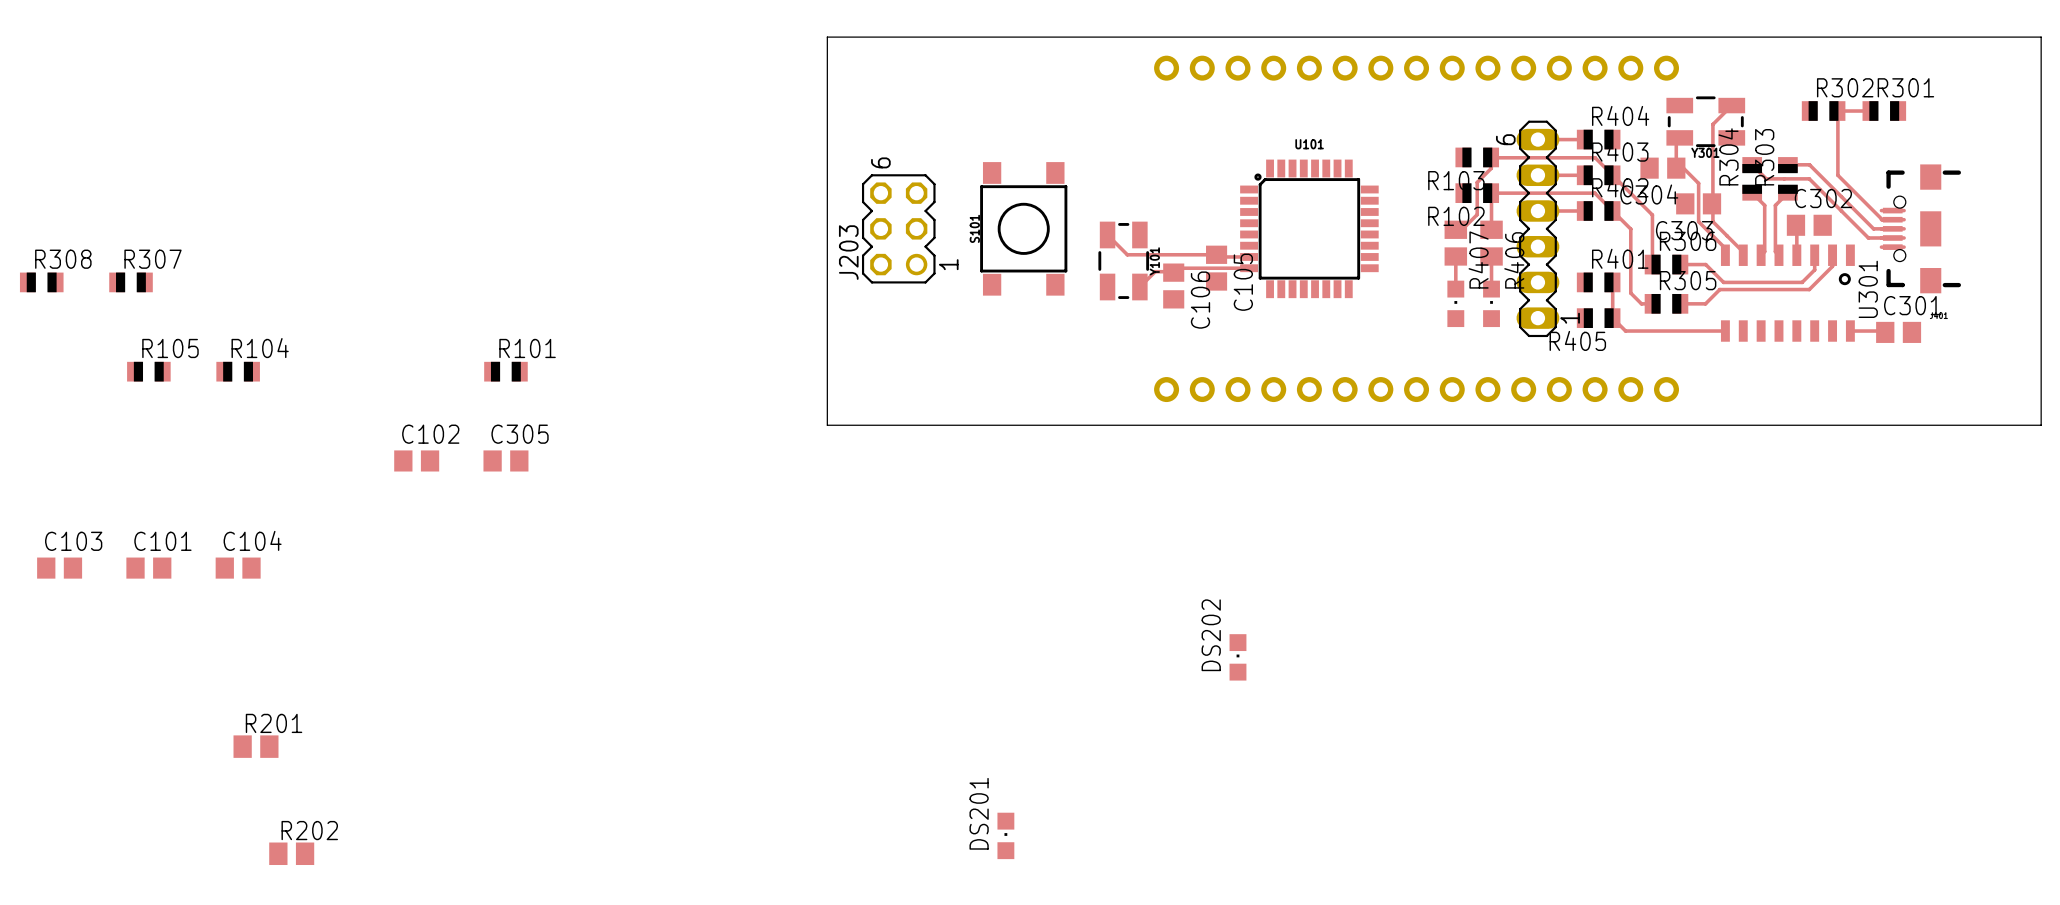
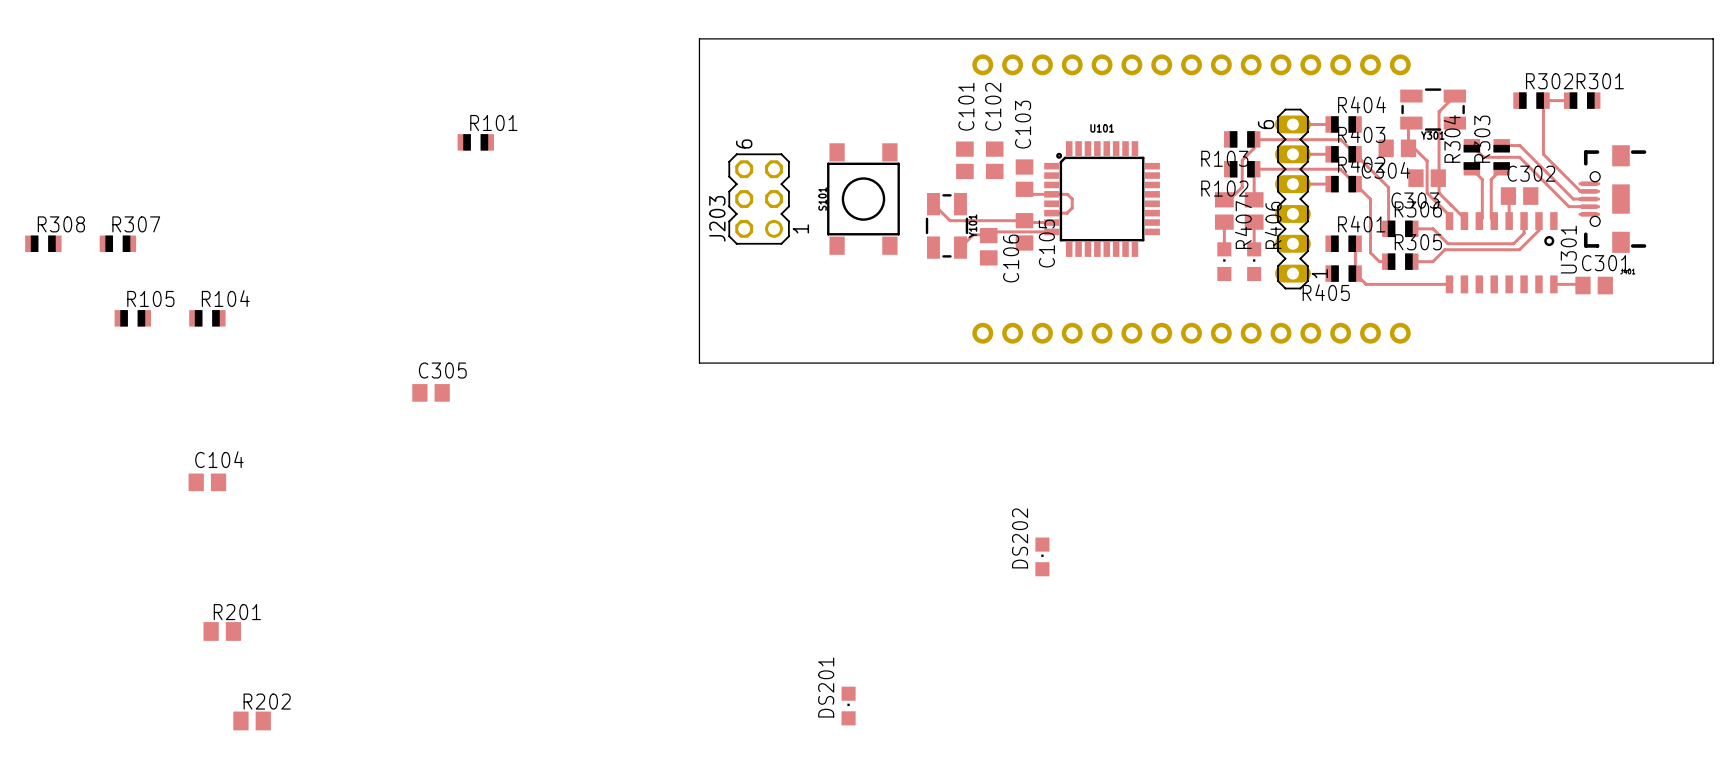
top track: none -> (1024, 189) (1029, 194) (1067, 194) (1072, 199) (1072, 207) (1067, 213) (1050, 213)
R101 position: (505, 371) -> (475, 142)
C102 name position: C102 (430, 434) -> C102 (993, 106)
C102 rotation: 0° (416, 460) -> 90° clockwise (994, 160)
C102 position: (416, 460) -> (994, 160)
C103 name position: C103 (73, 541) -> C103 (1023, 124)
C101 name position: C101 (162, 541) -> C101 (966, 106)
C103 rotation: 0° (59, 568) -> 90° clockwise (1024, 178)
C103 position: (59, 568) -> (1024, 178)
C101 rotation: 0° (148, 568) -> 90° clockwise (964, 160)
C101 position: (148, 568) -> (964, 160)

